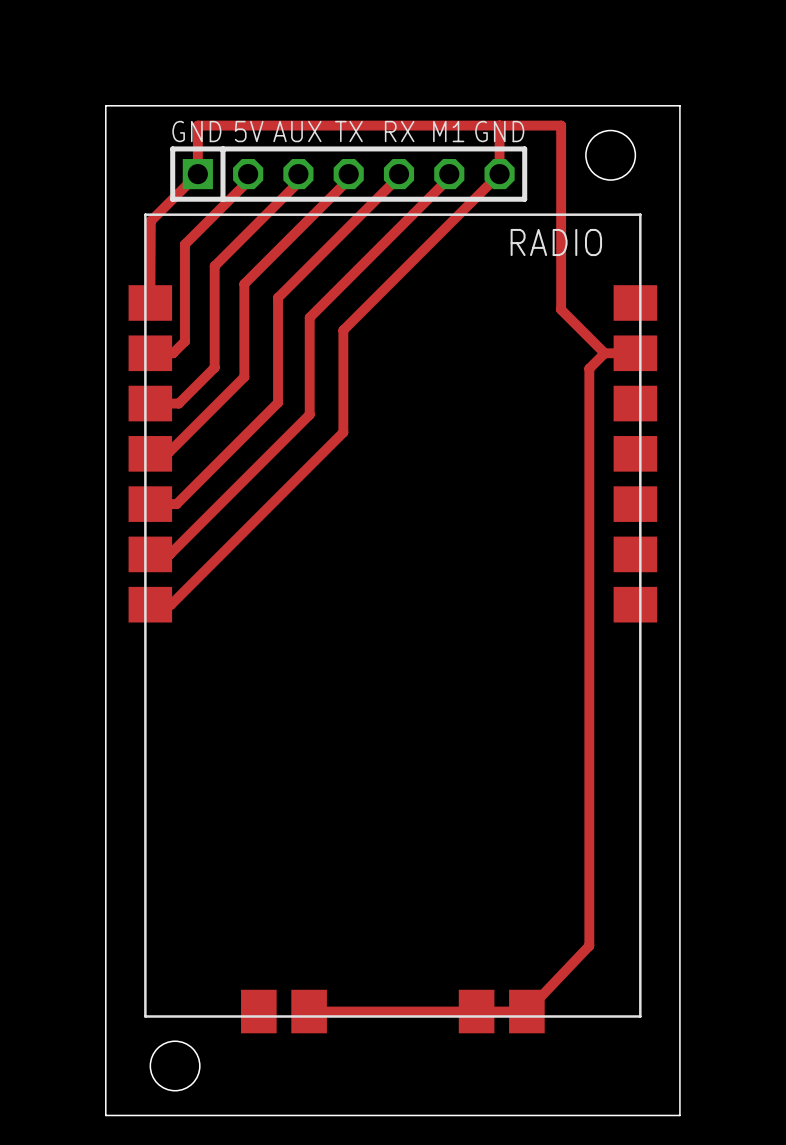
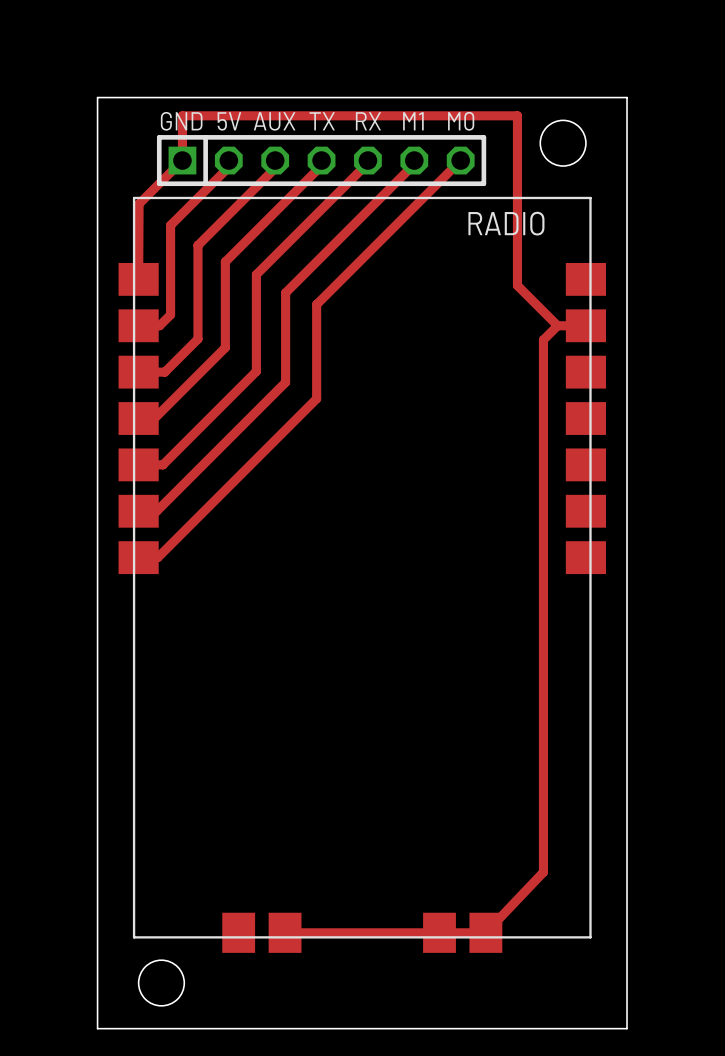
top track: (499, 125) (499, 174) -> none
text: GND (499, 131) -> M0 (461, 121)

